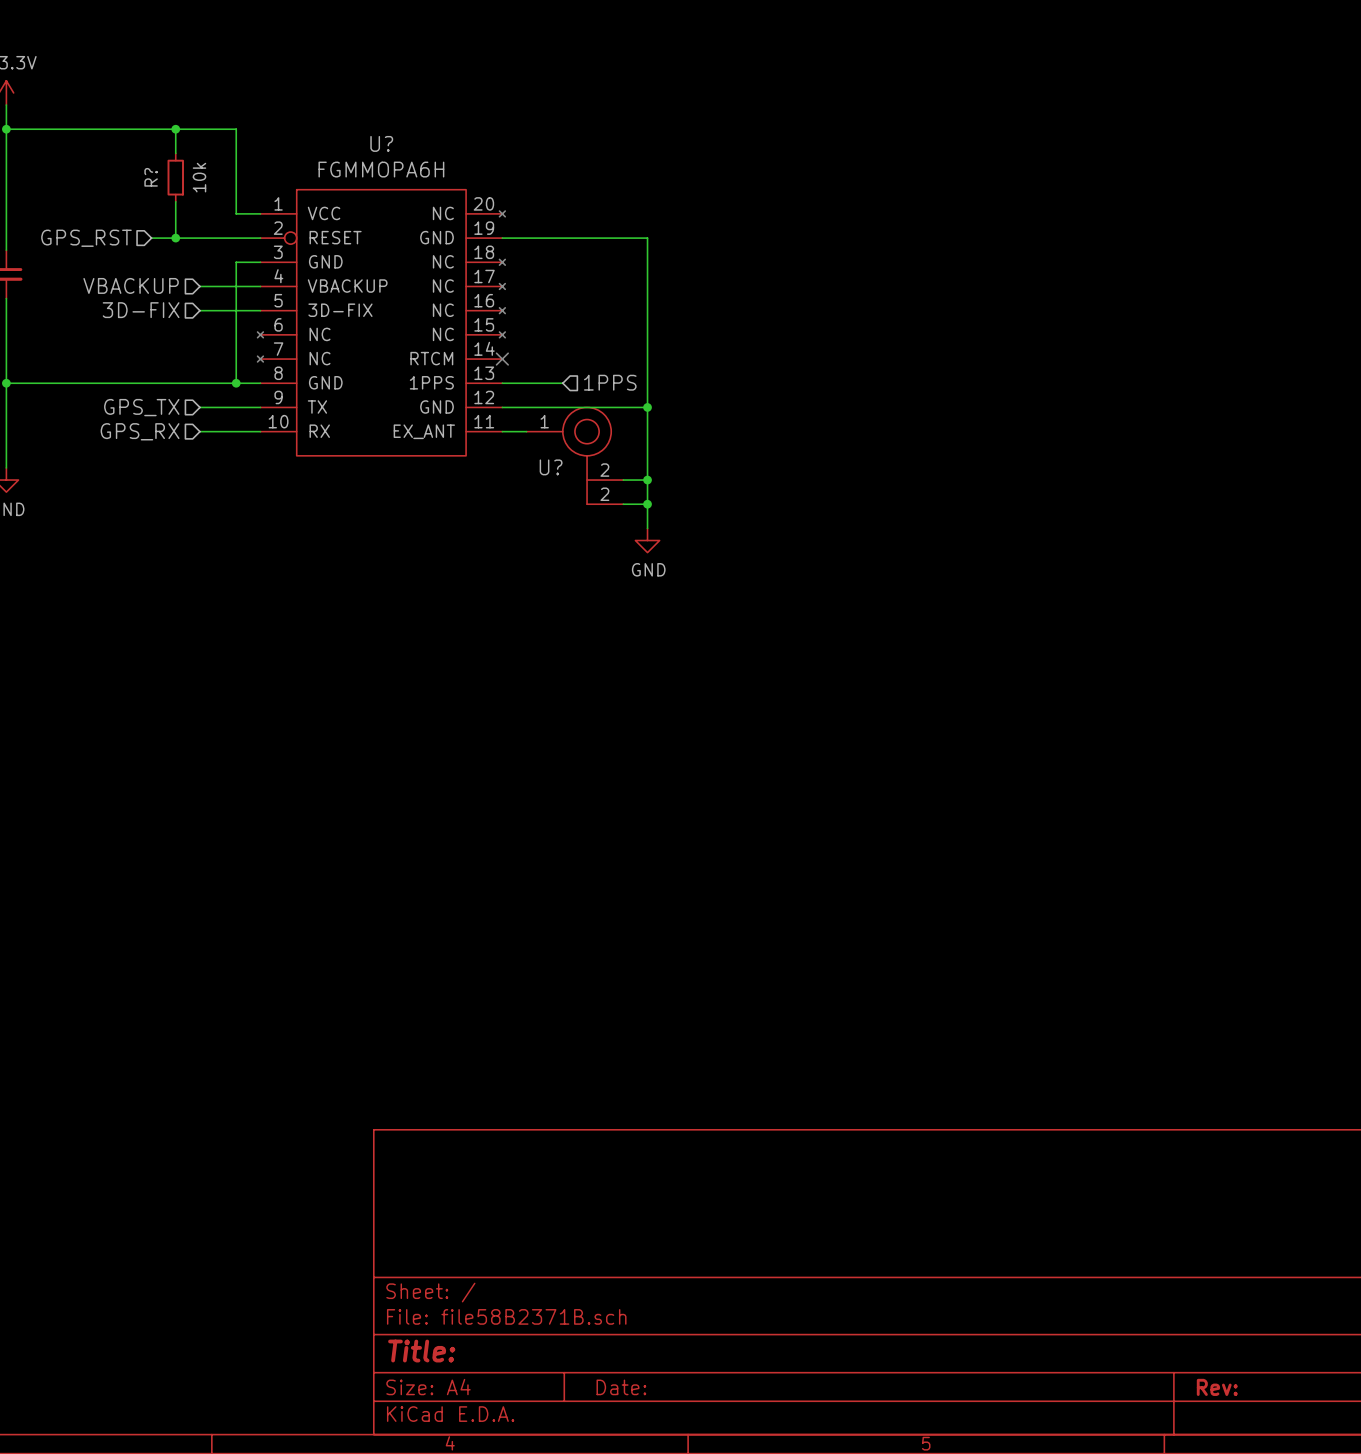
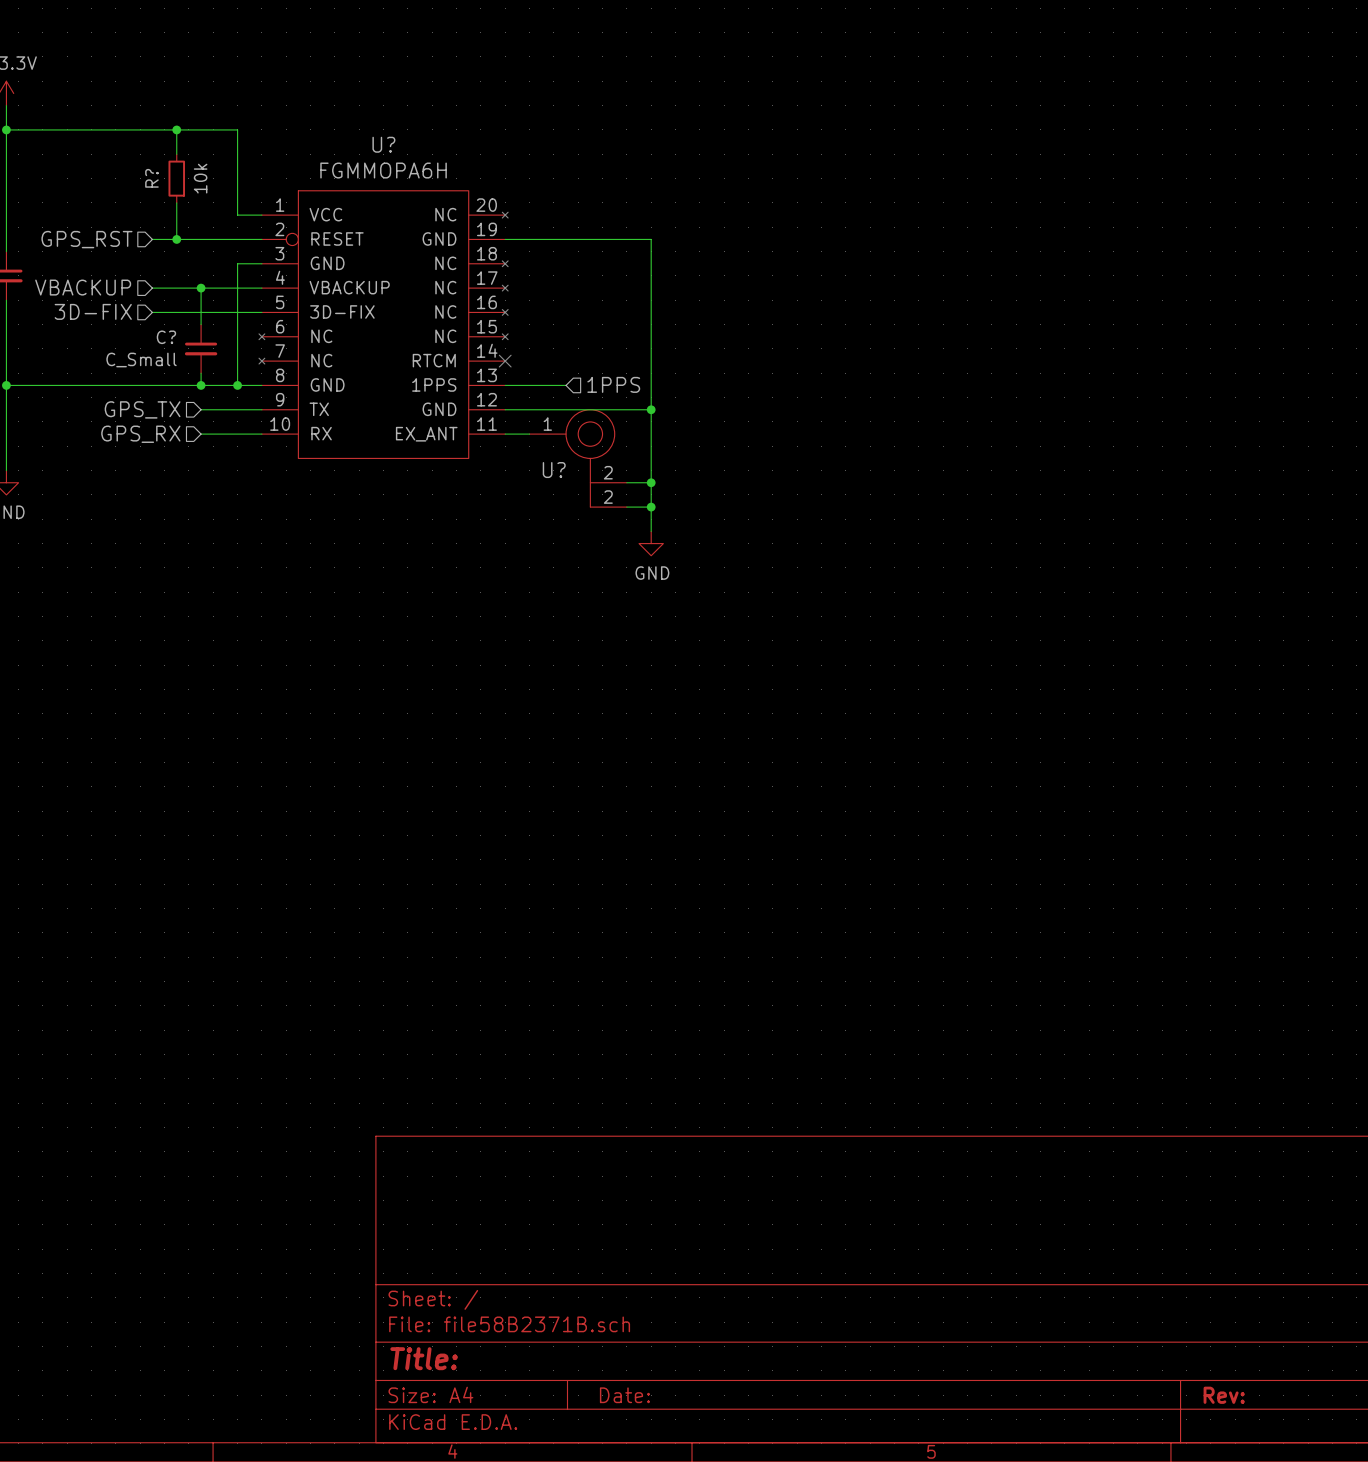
hierarchical label position: VBACKUP (131, 285) -> VBACKUP (83, 287)
wire: none -> (152, 288) (201, 288) (201, 324)
junction: none -> (201, 288)
hierarchical label position: 3D-FIX (141, 310) -> 3D-FIX (93, 311)
wire: none -> (152, 312) (201, 312)
C?: none -> C_Small (201, 348)
wire: none -> (201, 373) (201, 385)
junction: none -> (201, 385)

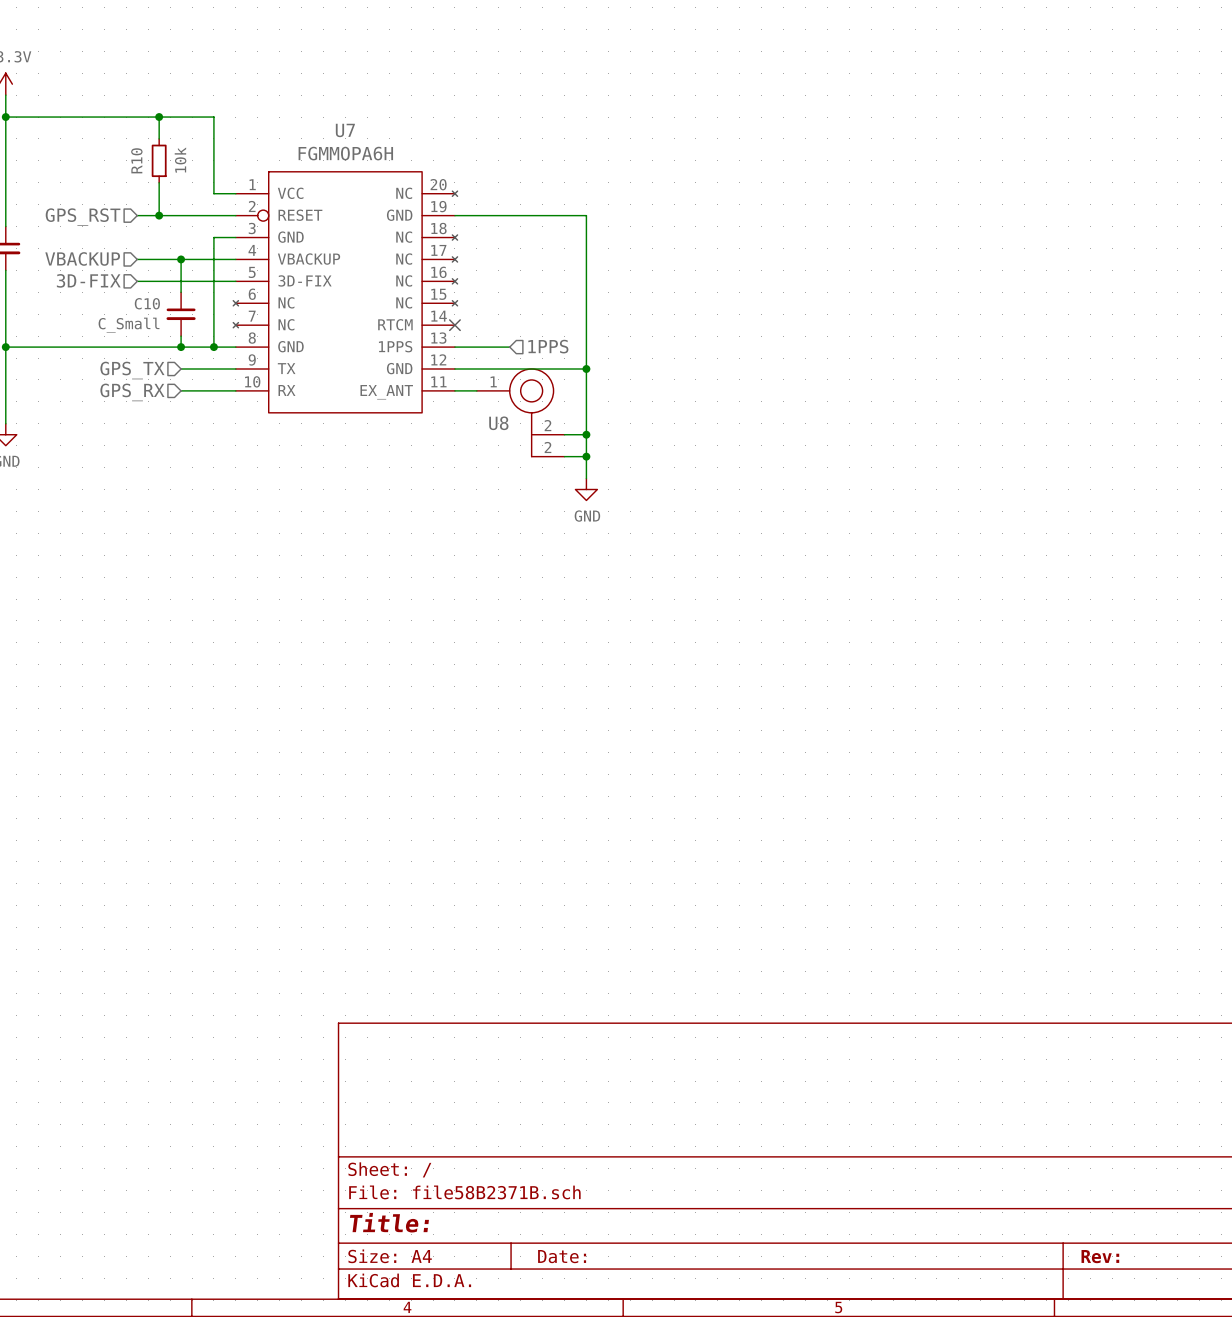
U? name: U? (383, 144) -> U7 (345, 130)
R? name: R? (151, 178) -> R10 (136, 160)
C? name: C? (166, 337) -> C10 (147, 303)
U? name: U? (554, 470) -> U8 (498, 423)

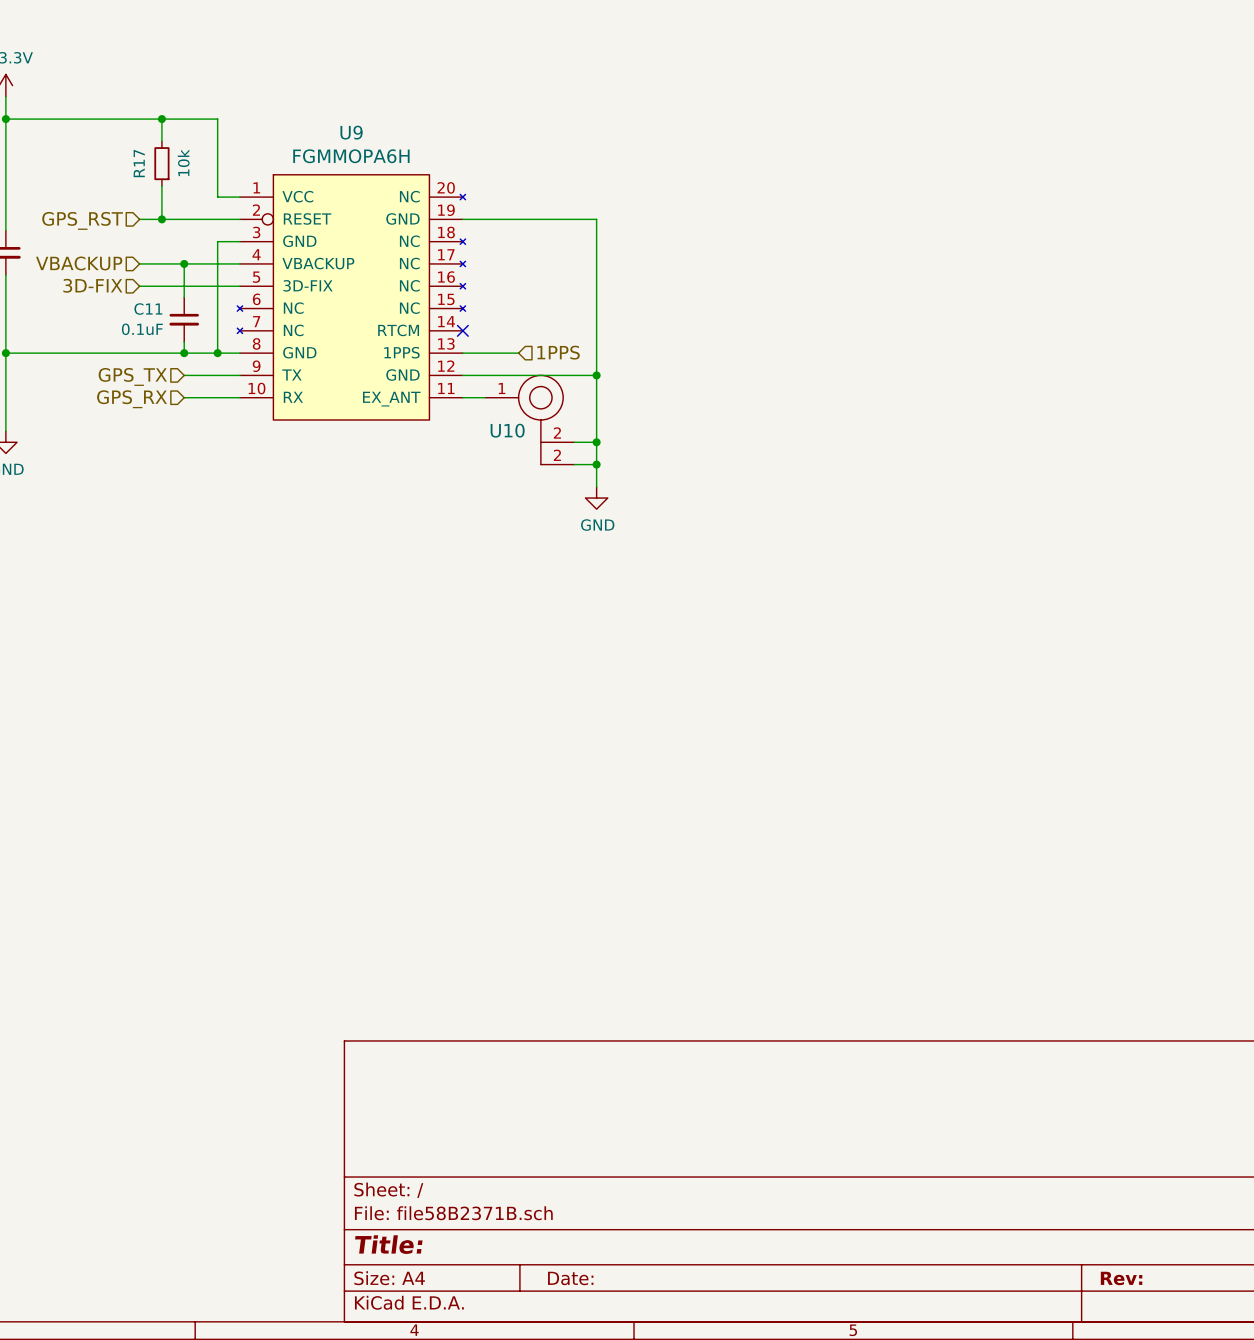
U7 name: U7 (345, 130) -> U9 (351, 132)
R10 name: R10 (136, 160) -> R17 (139, 163)
C10 name: C10 (147, 303) -> C11 (148, 309)
C10 value: C_Small (129, 325) -> 0.1uF (142, 329)
U8 name: U8 (498, 423) -> U10 (507, 430)

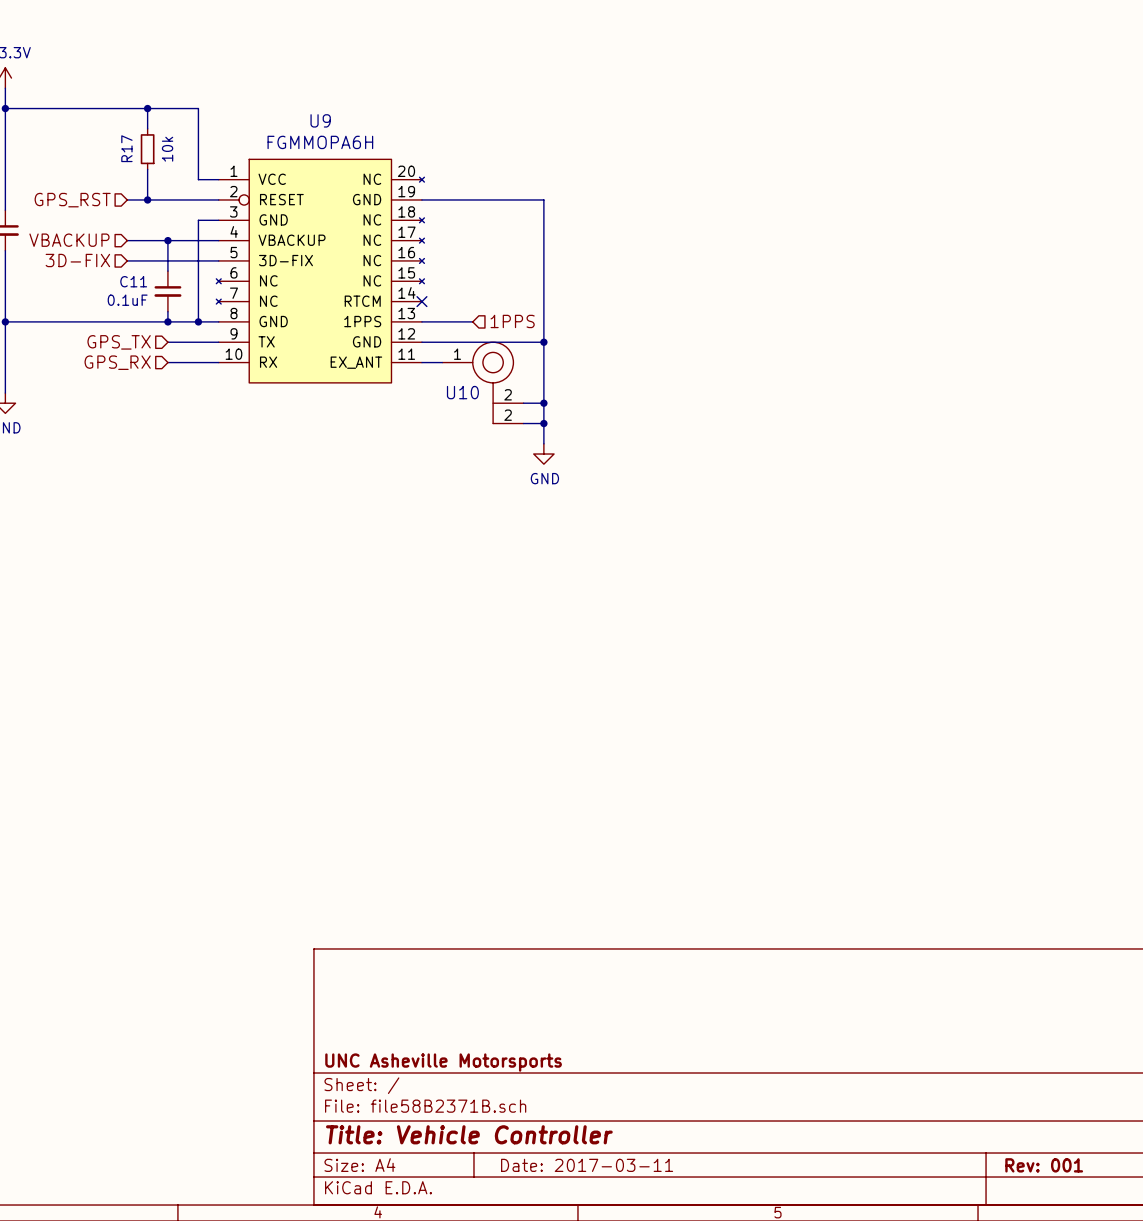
title block: none -> UNC Asheville Motorsports (443, 1062)
title block: Title: (388, 1244) -> Title: Vehicle Controller (469, 1134)
title block: Date: (570, 1278) -> Date: 2017-03-11 (587, 1165)
title block: Rev: (1121, 1278) -> Rev: 001 (1044, 1165)

